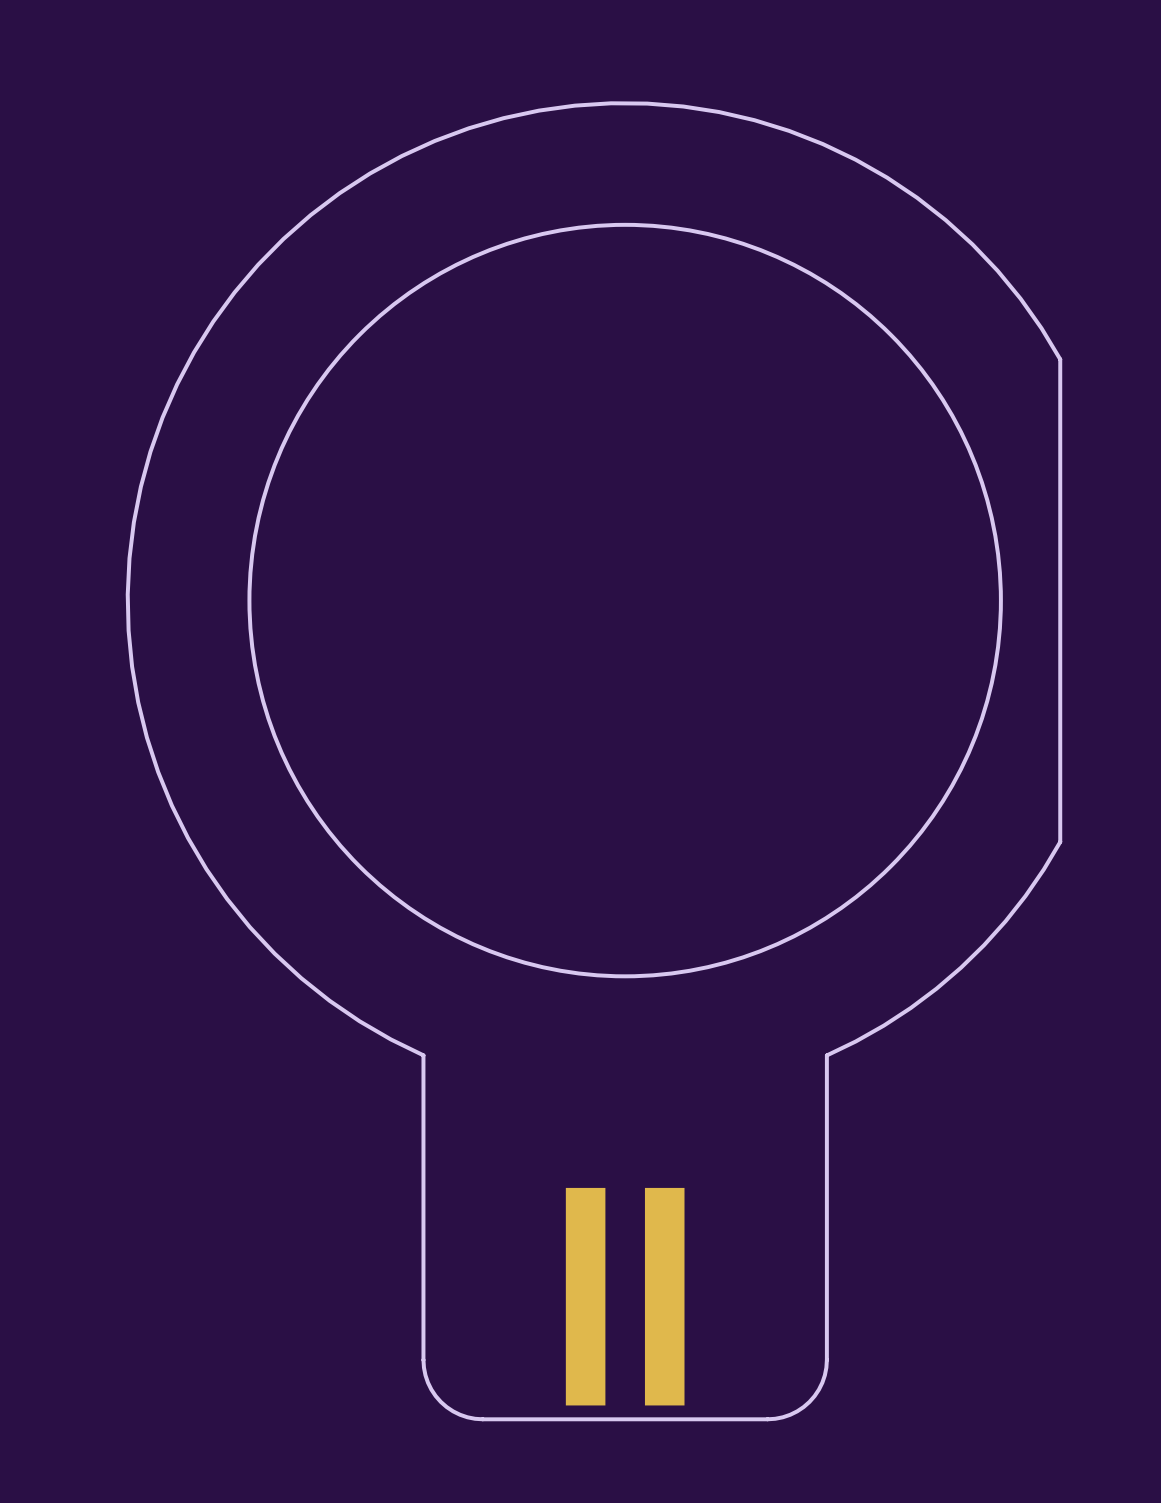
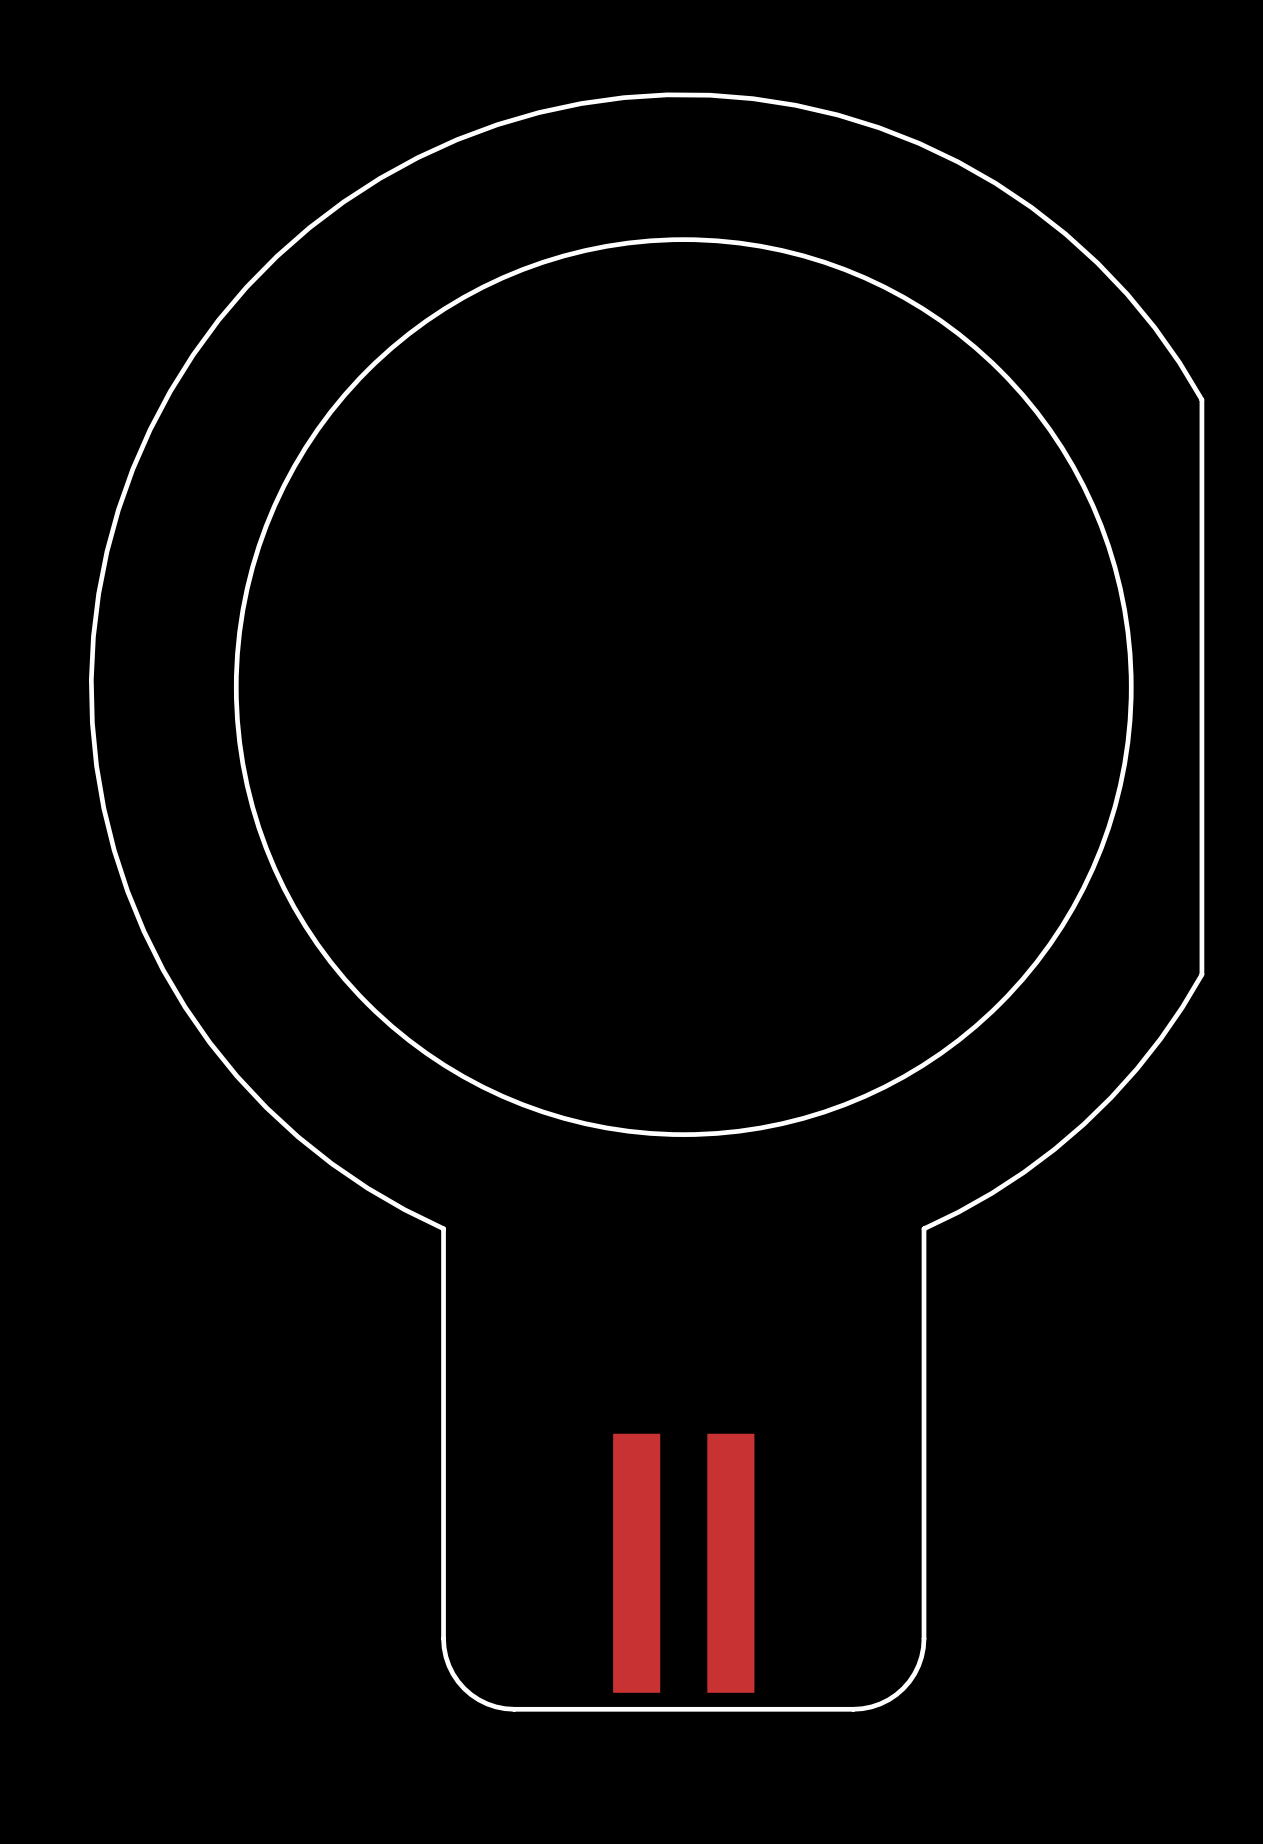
part position: (625, 1296) -> (683, 1563)
board edge: (423, 1359) (427, 1382) (440, 1401) (460, 1414) (482, 1419) (775, 1418) (797, 1411) (814, 1396) (824, 1375) (826, 1359) -> (443, 1591) (444, 1647) (453, 1673) (464, 1688) (478, 1699) (495, 1706) (514, 1709) (853, 1709) (871, 1706) (896, 1694) (909, 1681) (918, 1665) (923, 1647) (924, 1591)

